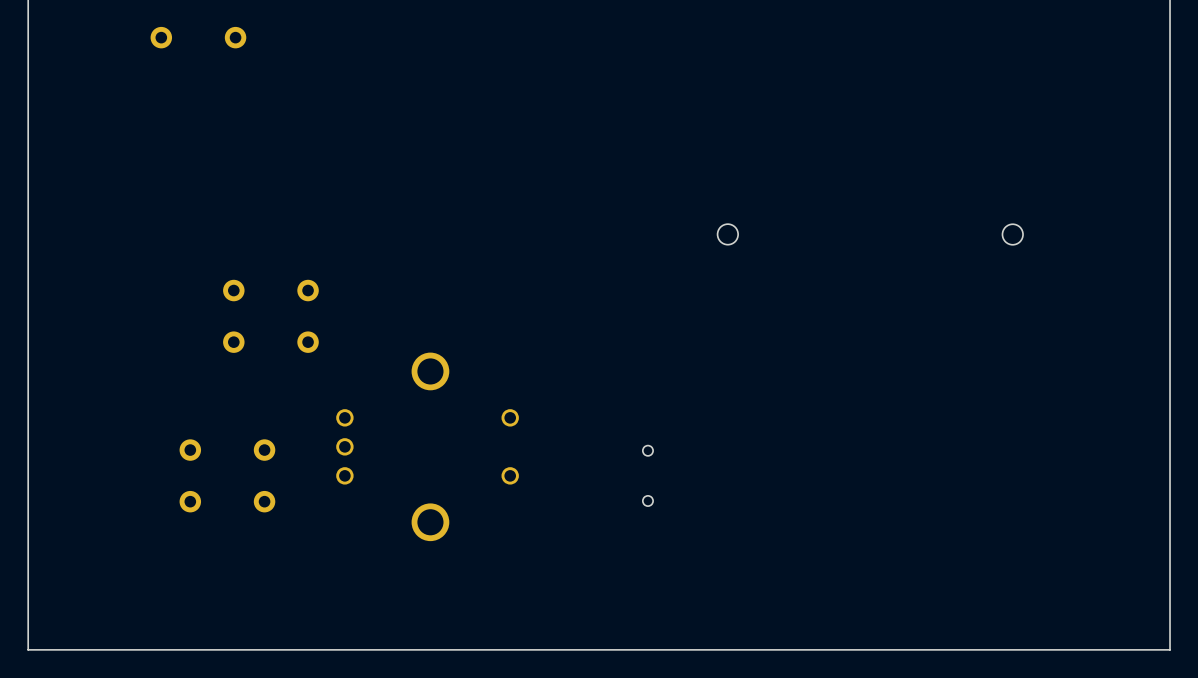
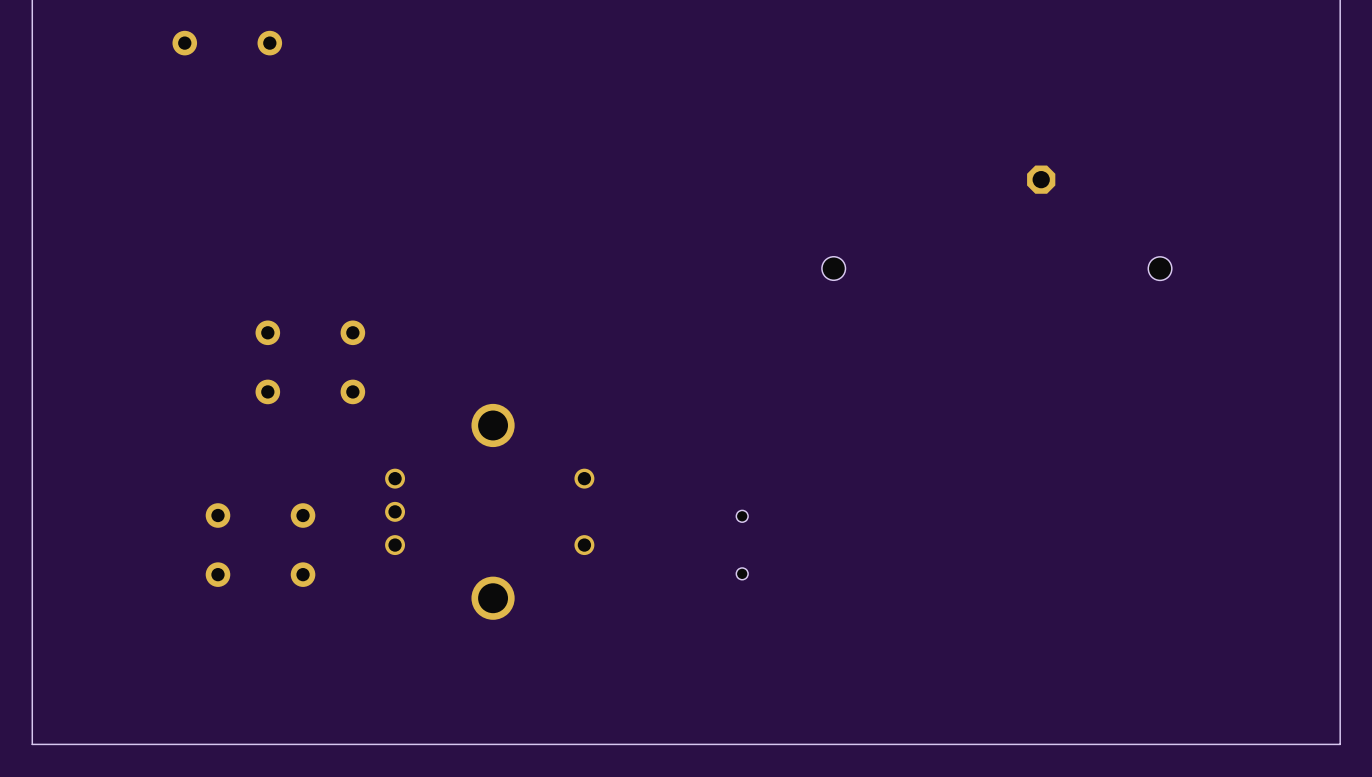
part: none -> (1041, 179)

